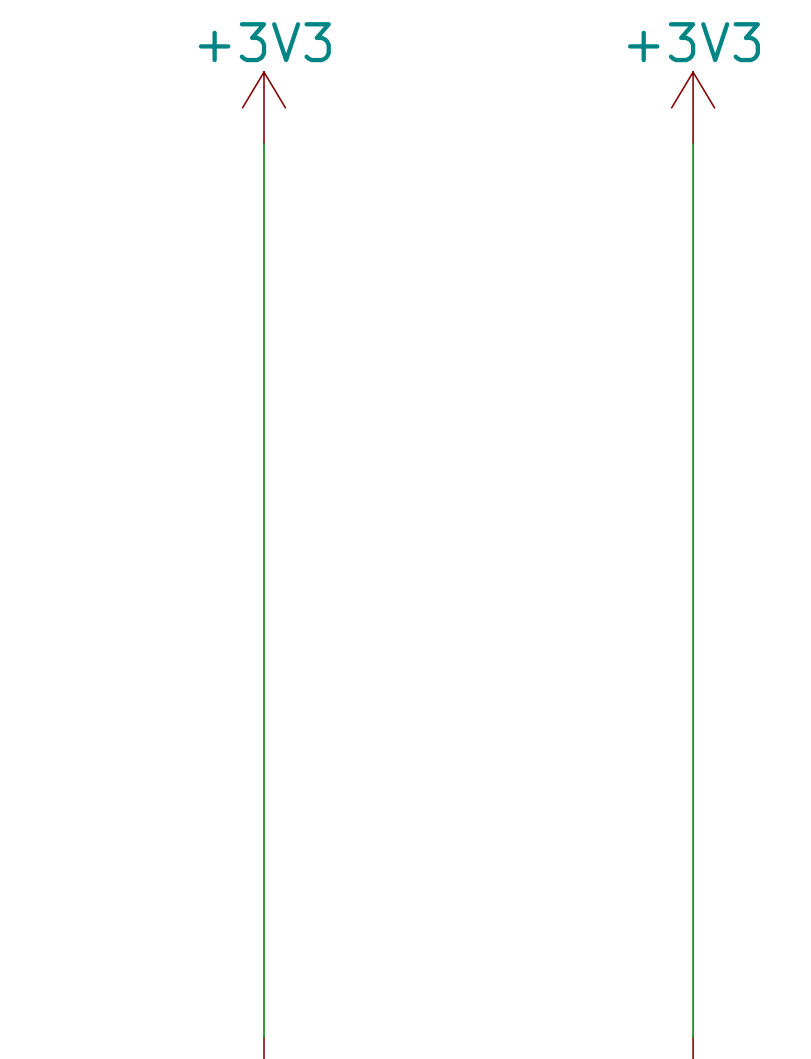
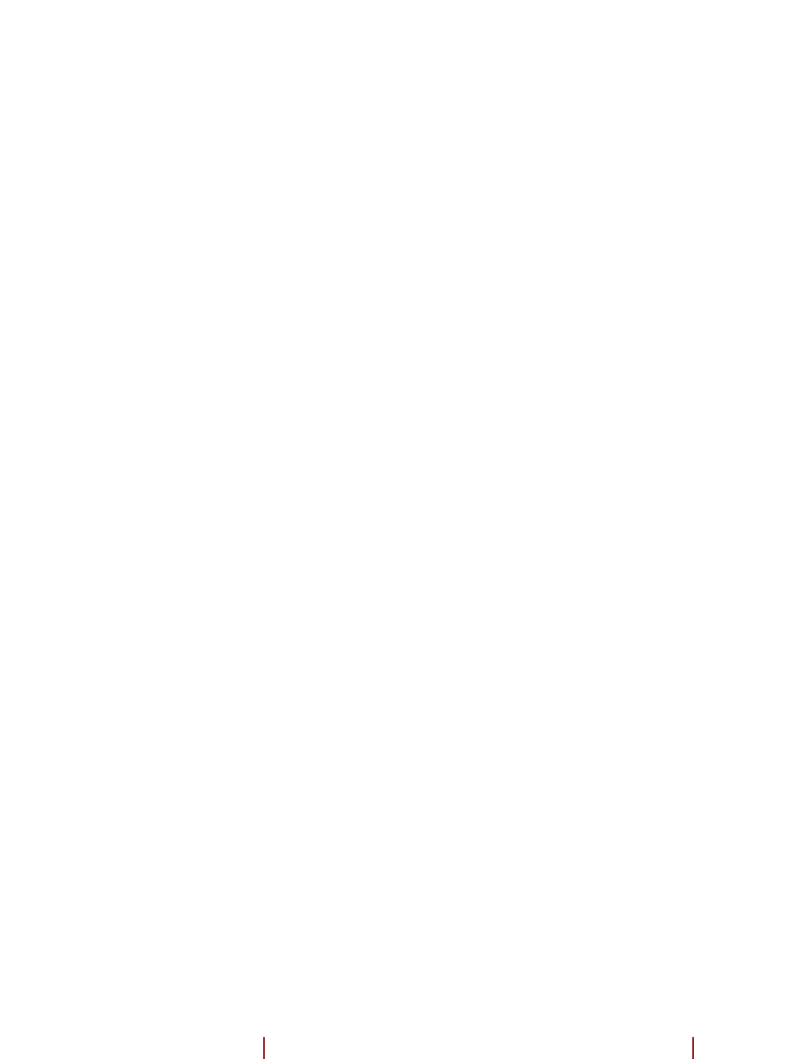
power symbol: +3V3 (264, 107) -> none
power symbol: +3V3 (693, 107) -> none
wire: (264, 143) (264, 1037) -> none
wire: (693, 143) (693, 1037) -> none

